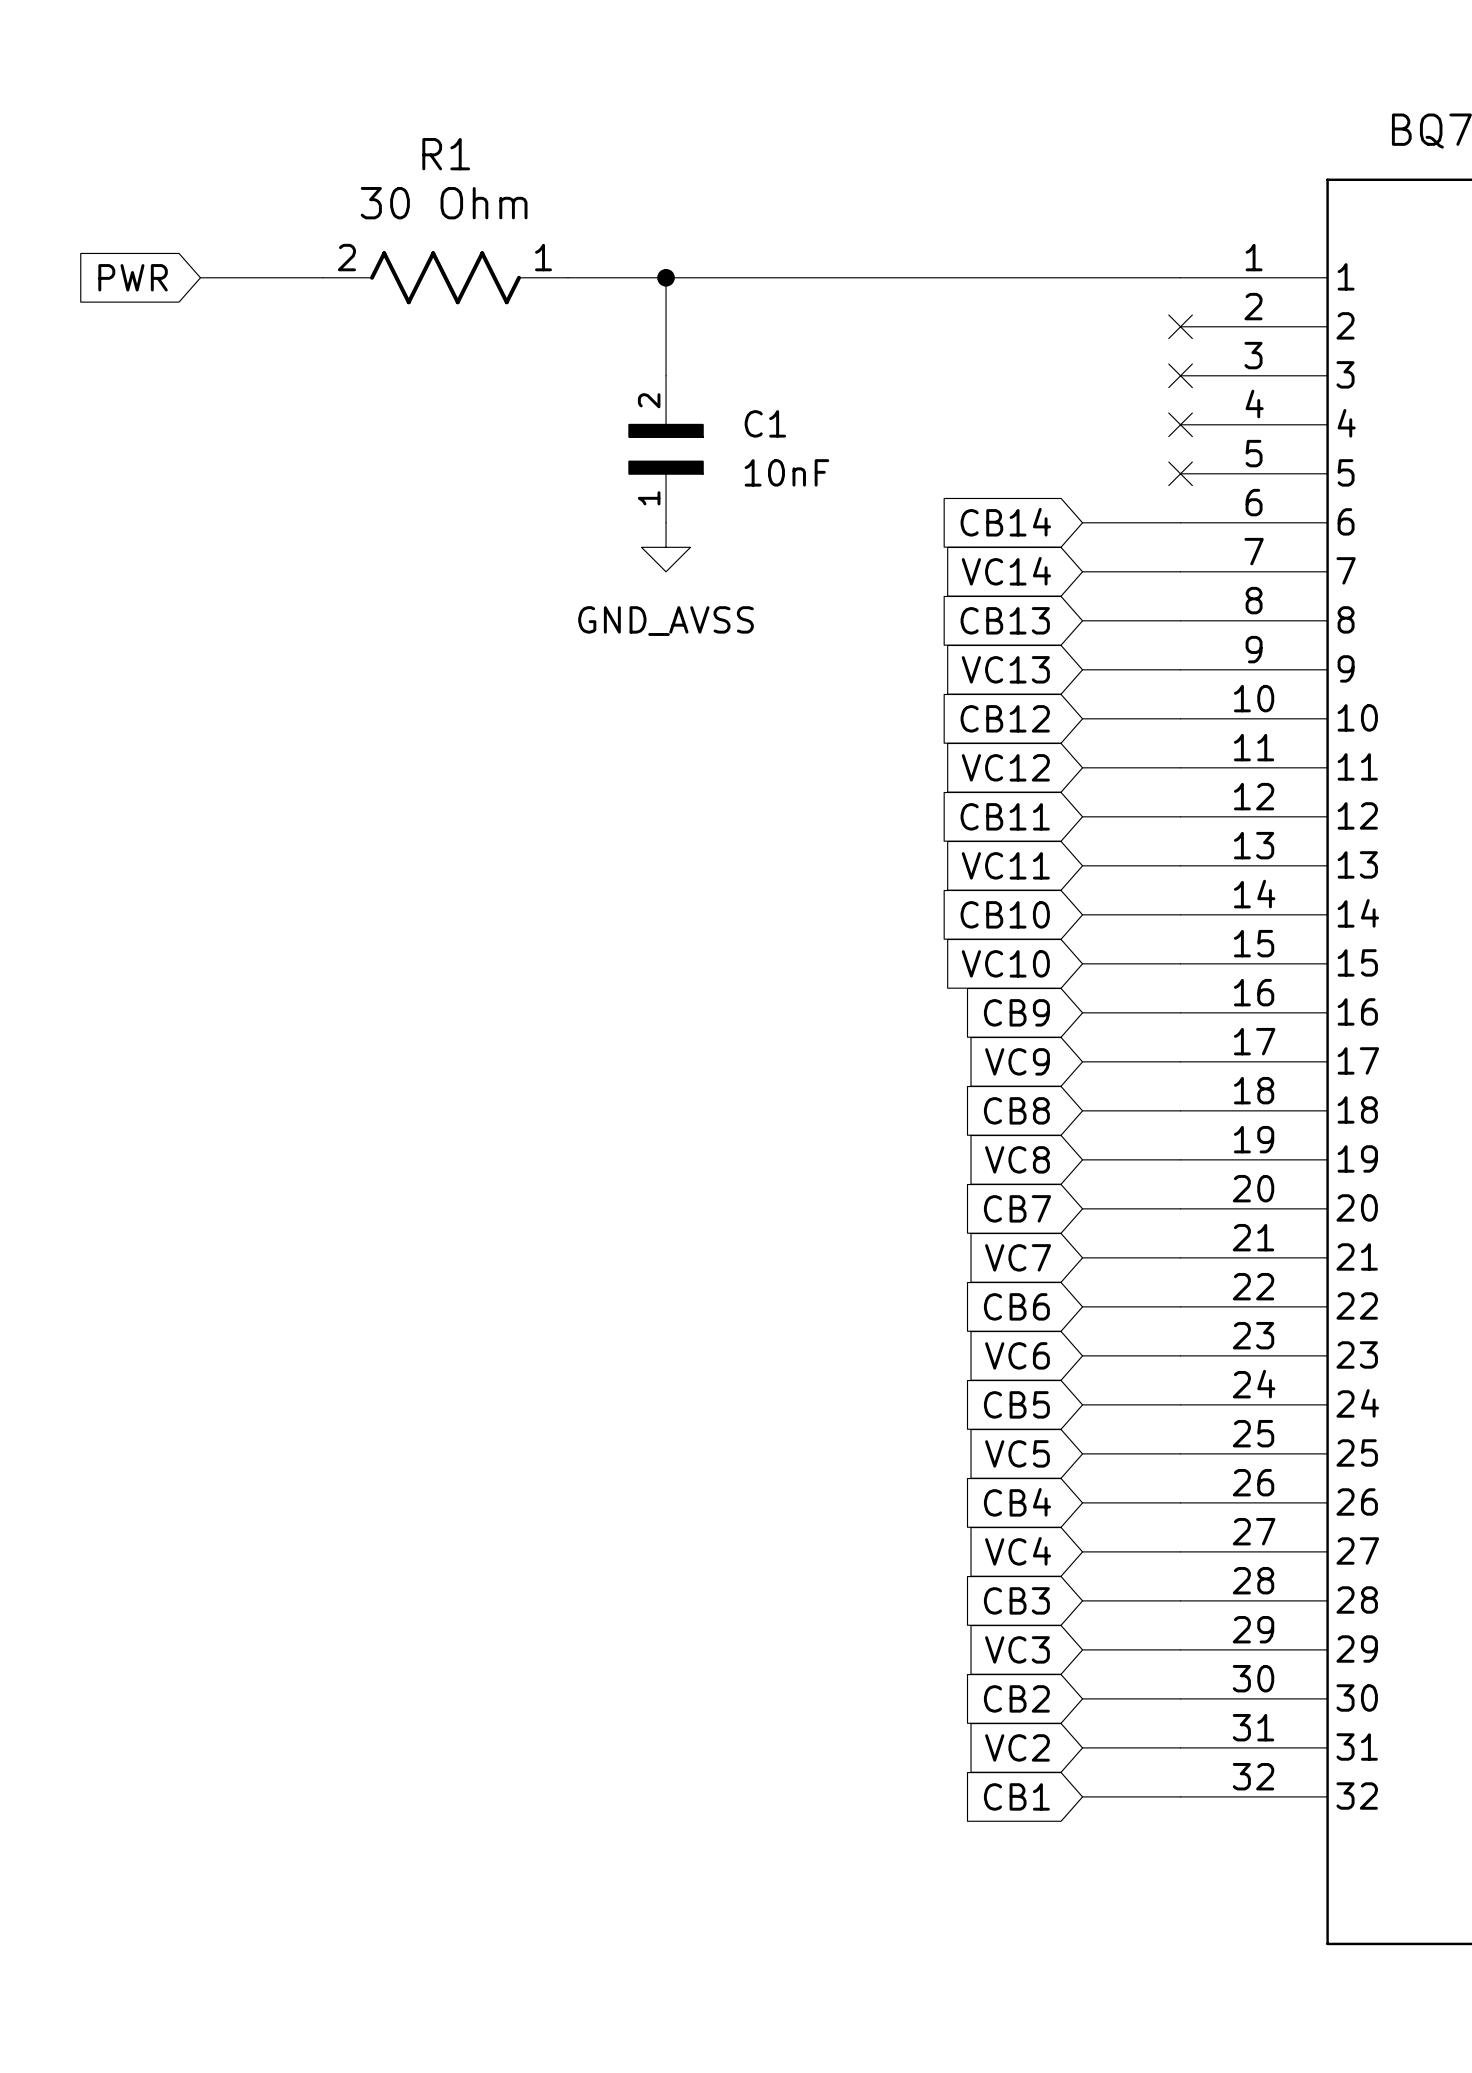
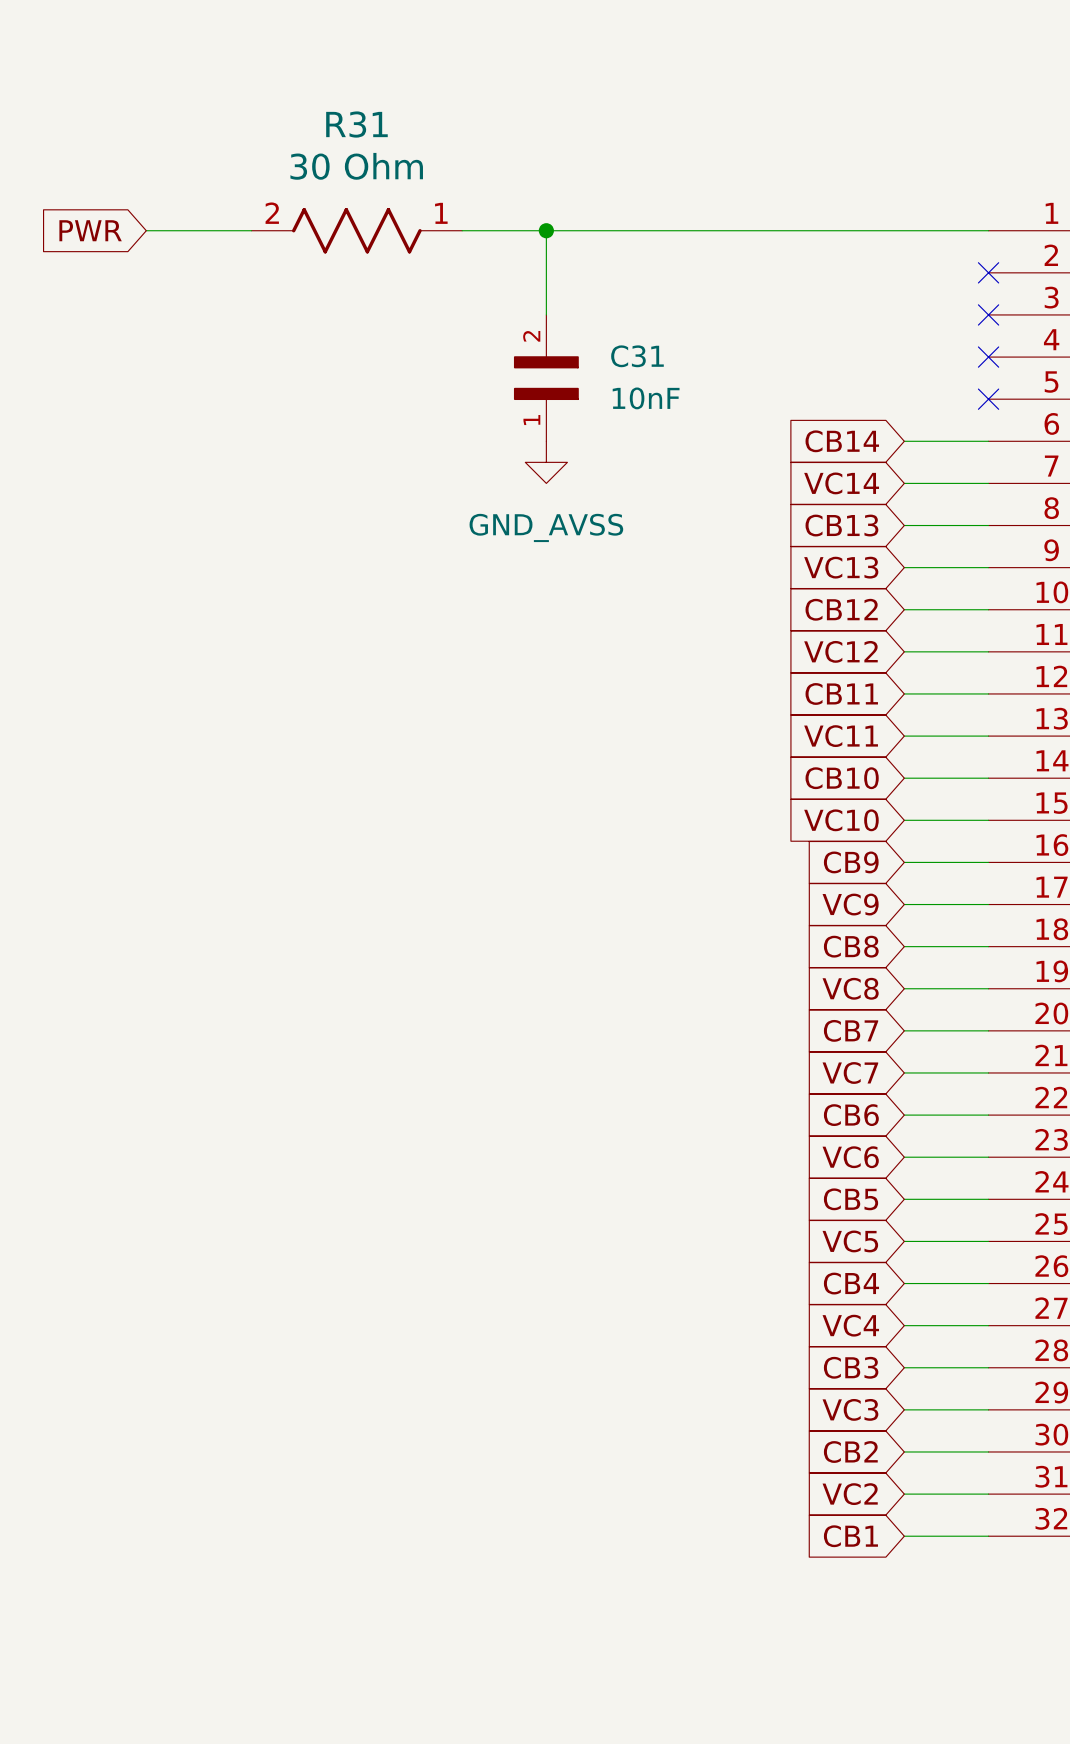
R1 name: R1 (446, 154) -> R31 (356, 124)
C1 name: C1 (765, 423) -> C31 (637, 356)

